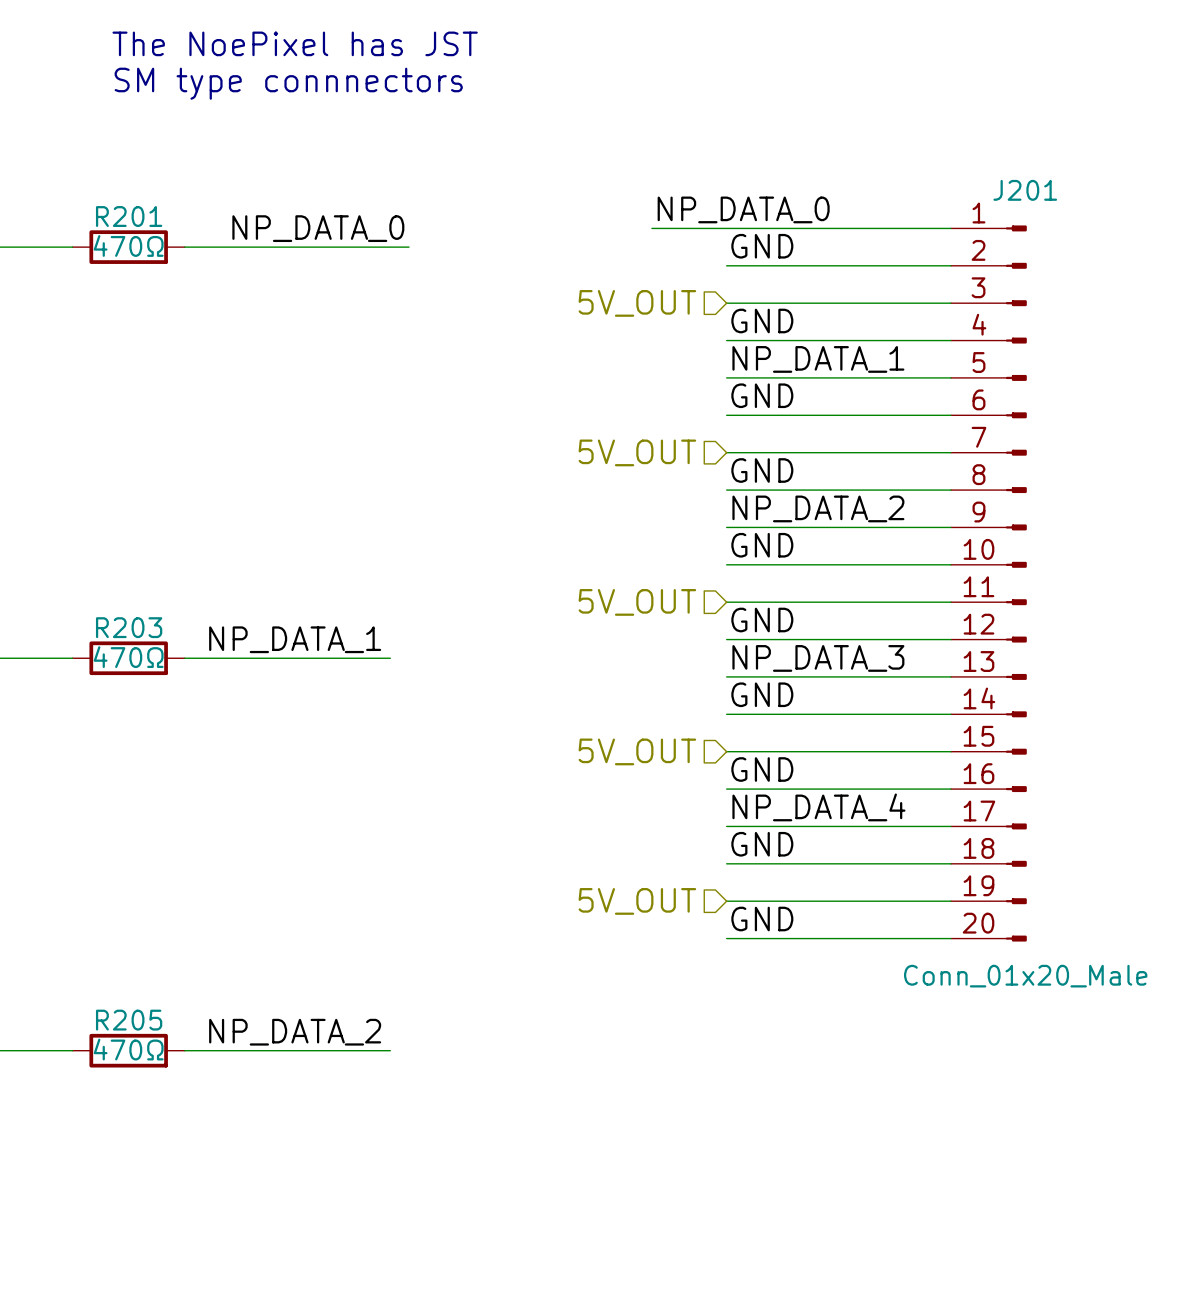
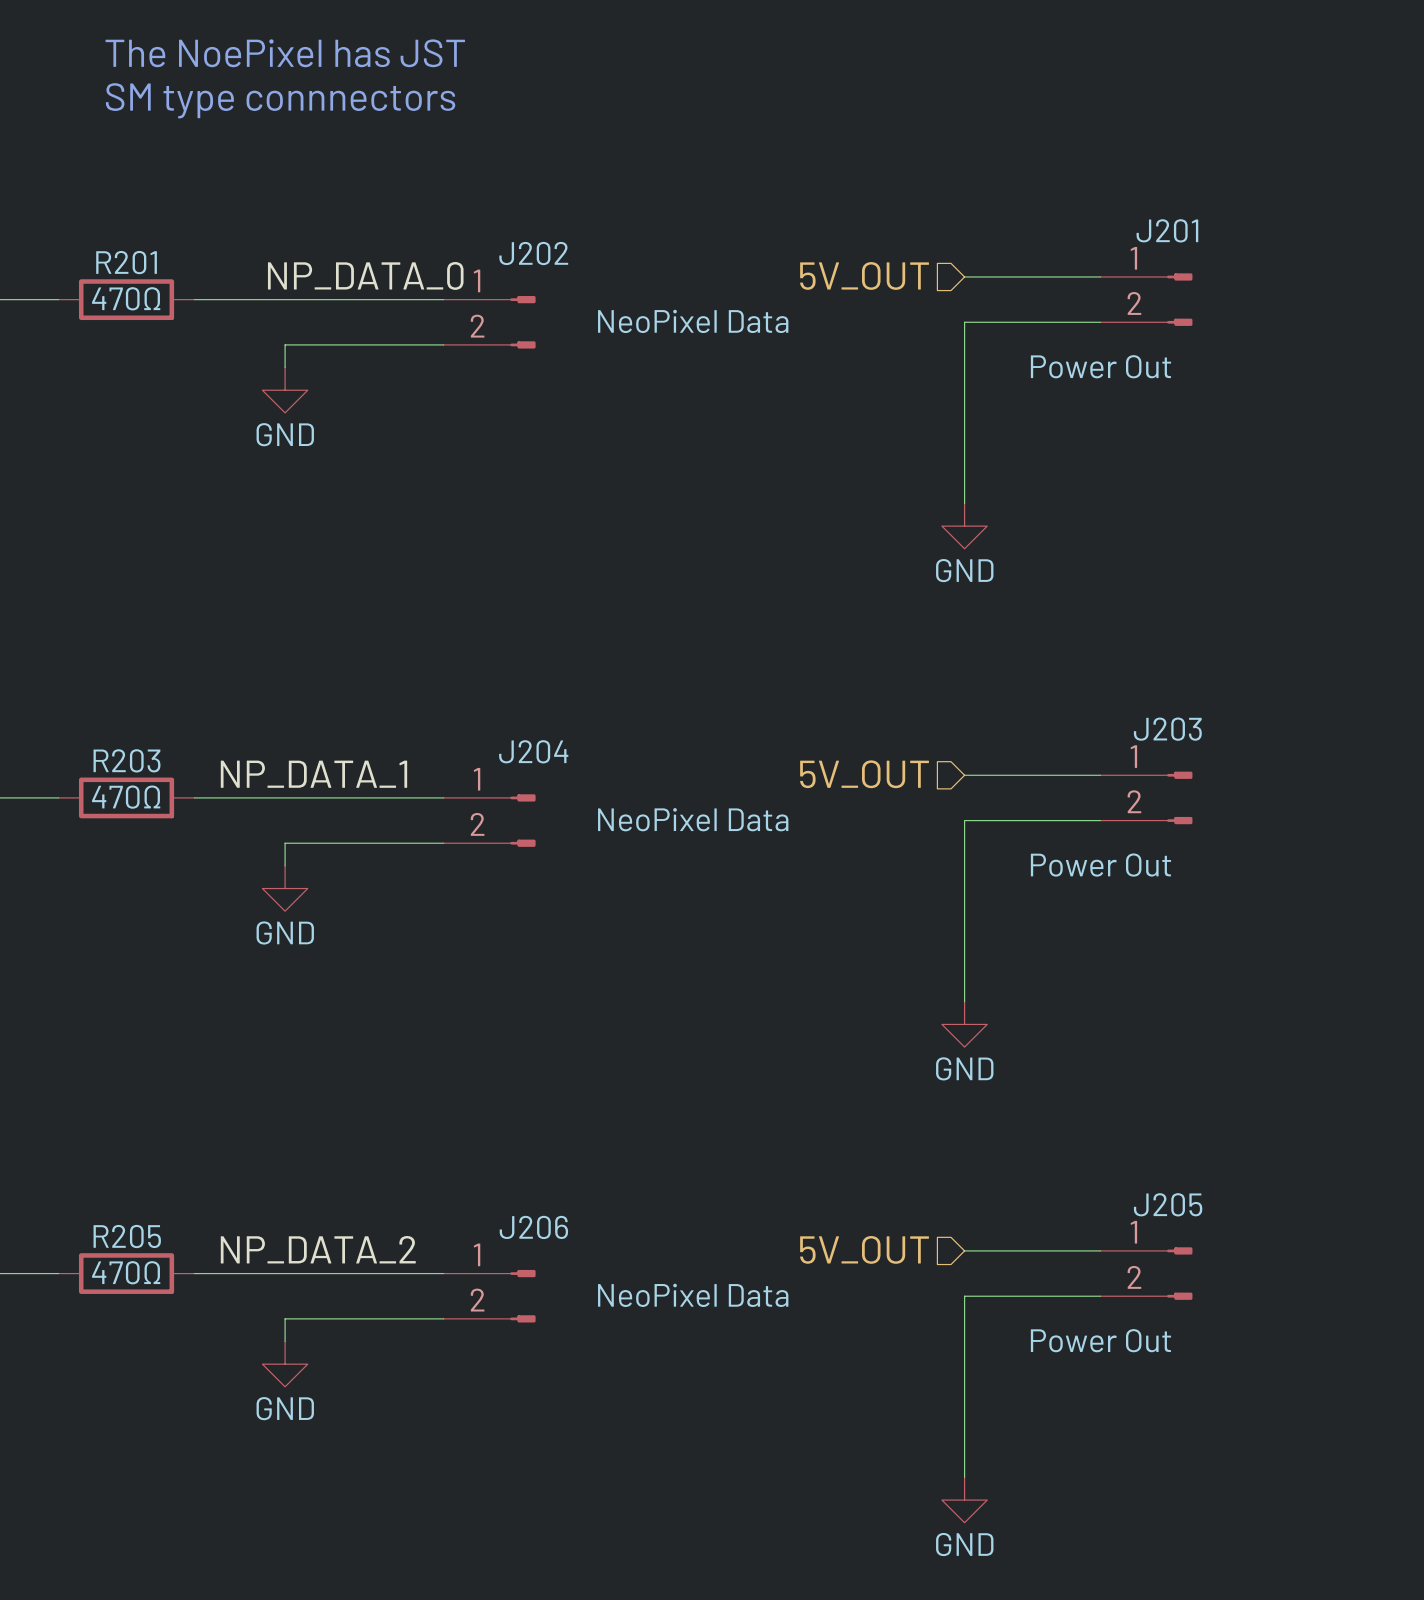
J201 name position: J201 (1025, 190) -> J201 (1167, 230)
label: NP_DATA_0 (743, 209) -> none
J201 symbol: [950, 225, 1027, 942] -> [1100, 273, 1193, 326]
wire: (651, 228) (820, 228) -> none
label: GND (762, 246) -> none
J202: none -> NeoPixel Data (489, 322)
wire: (726, 265) (820, 265) -> (964, 503) (964, 322)
wire: none -> (443, 344) (285, 344) (285, 367)
hierarchical label position: 5V_OUT (637, 303) -> 5V_OUT (864, 275)
wire: (726, 303) (950, 303) -> none
label: GND (762, 320) -> none
power symbol: none -> GND (285, 390)
wire: (726, 340) (950, 340) -> none
label: NP_DATA_1 (818, 359) -> none
wire: (726, 377) (950, 377) -> none
label: GND (762, 395) -> none
wire: (726, 415) (950, 415) -> none
power symbol: none -> GND (964, 526)
hierarchical label: 5V_OUT (637, 452) -> none
wire: (726, 452) (950, 452) -> none
label: GND (762, 470) -> none
wire: (726, 490) (950, 490) -> none
label: NP_DATA_2 (818, 508) -> none
wire: (726, 527) (950, 527) -> none
label: GND (762, 545) -> none
wire: (726, 564) (950, 564) -> none
hierarchical label position: 5V_OUT (637, 602) -> 5V_OUT (864, 774)
wire: (726, 602) (950, 602) -> none
label: GND (762, 620) -> none
wire: (726, 639) (820, 639) -> none
label: NP_DATA_3 (818, 658) -> none
J203: none -> Power Out (1146, 797)
J204: none -> NeoPixel Data (489, 820)
wire: (726, 676) (820, 676) -> (964, 1001) (964, 820)
label: GND (762, 694) -> none
wire: none -> (443, 843) (285, 843) (285, 865)
wire: (726, 714) (950, 714) -> none
power symbol: none -> GND (285, 888)
hierarchical label: 5V_OUT (637, 751) -> none
wire: (726, 751) (950, 751) -> none
label: GND (762, 769) -> none
wire: (726, 789) (950, 789) -> none
label: NP_DATA_4 (818, 807) -> none
wire: (726, 826) (950, 826) -> none
label: GND (762, 844) -> none
power symbol: none -> GND (964, 1024)
wire: (726, 863) (950, 863) -> none
hierarchical label: 5V_OUT (637, 901) -> none
wire: (726, 901) (950, 901) -> none
label: GND (762, 919) -> none
wire: (726, 938) (950, 938) -> none
J201 value: Conn_01x20_Male (1025, 976) -> Power Out (1100, 366)
hierarchical label: none -> 5V_OUT (864, 1249)
wire: none -> (964, 1250) (1100, 1250)
J205: none -> Power Out (1146, 1273)
J206: none -> NeoPixel Data (489, 1296)
wire: none -> (1100, 1296) (964, 1296) (964, 1477)
wire: none -> (443, 1318) (285, 1318) (285, 1341)
power symbol: none -> GND (285, 1364)
power symbol: none -> GND (964, 1500)

